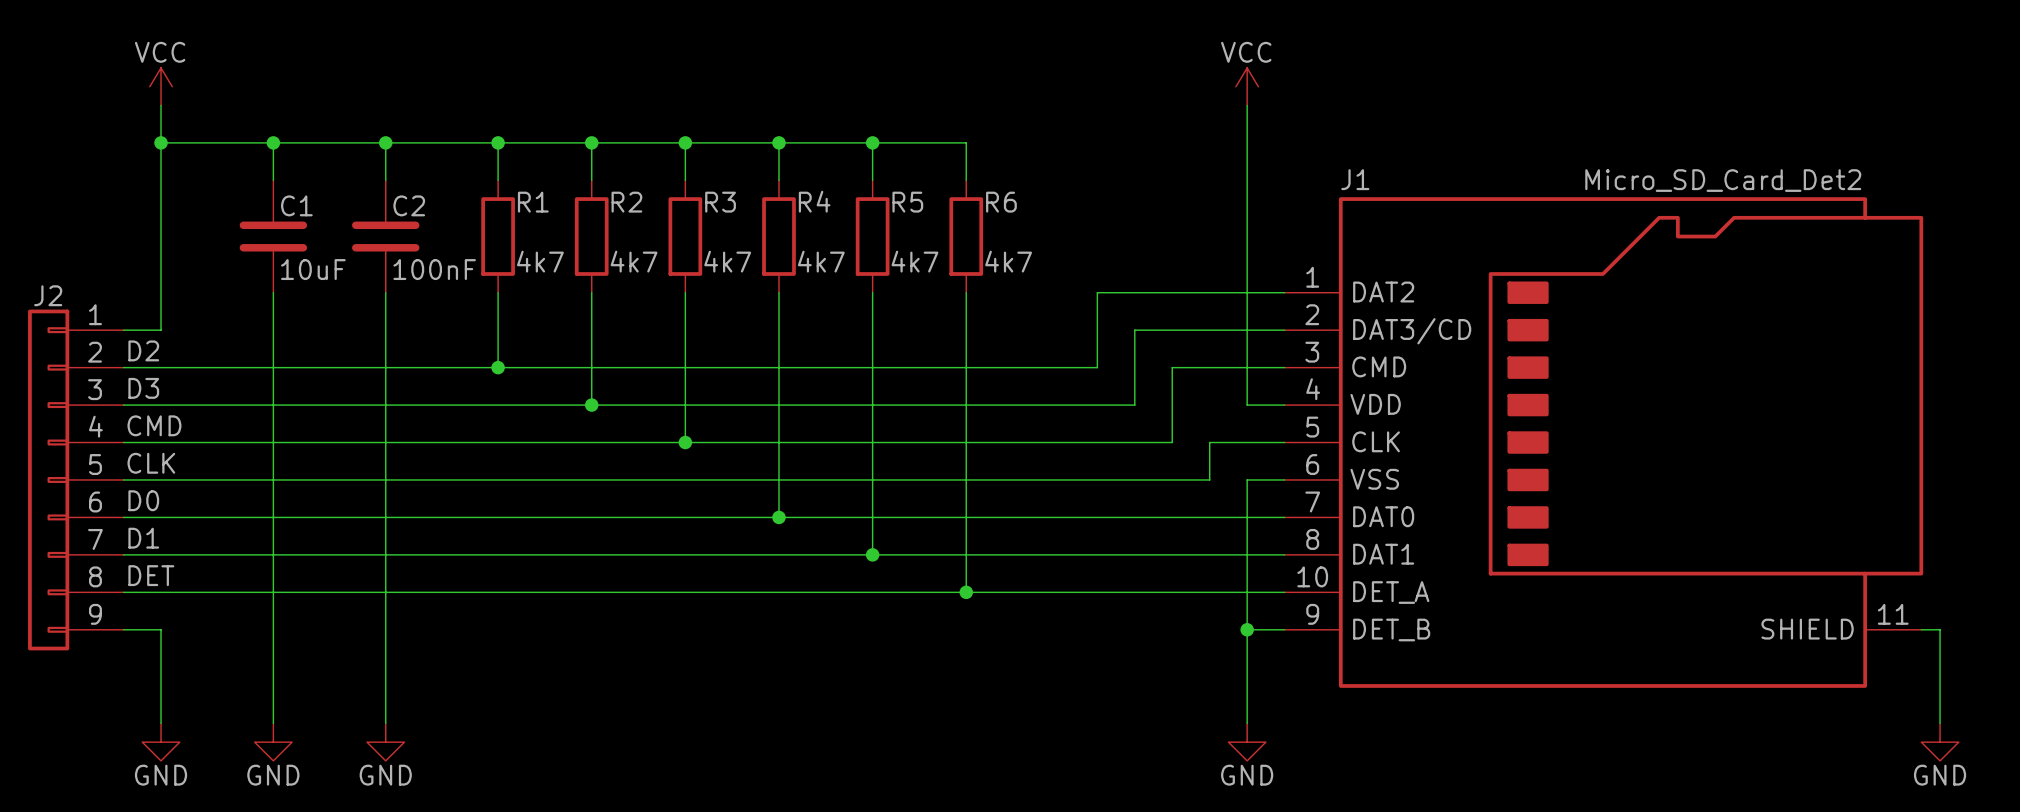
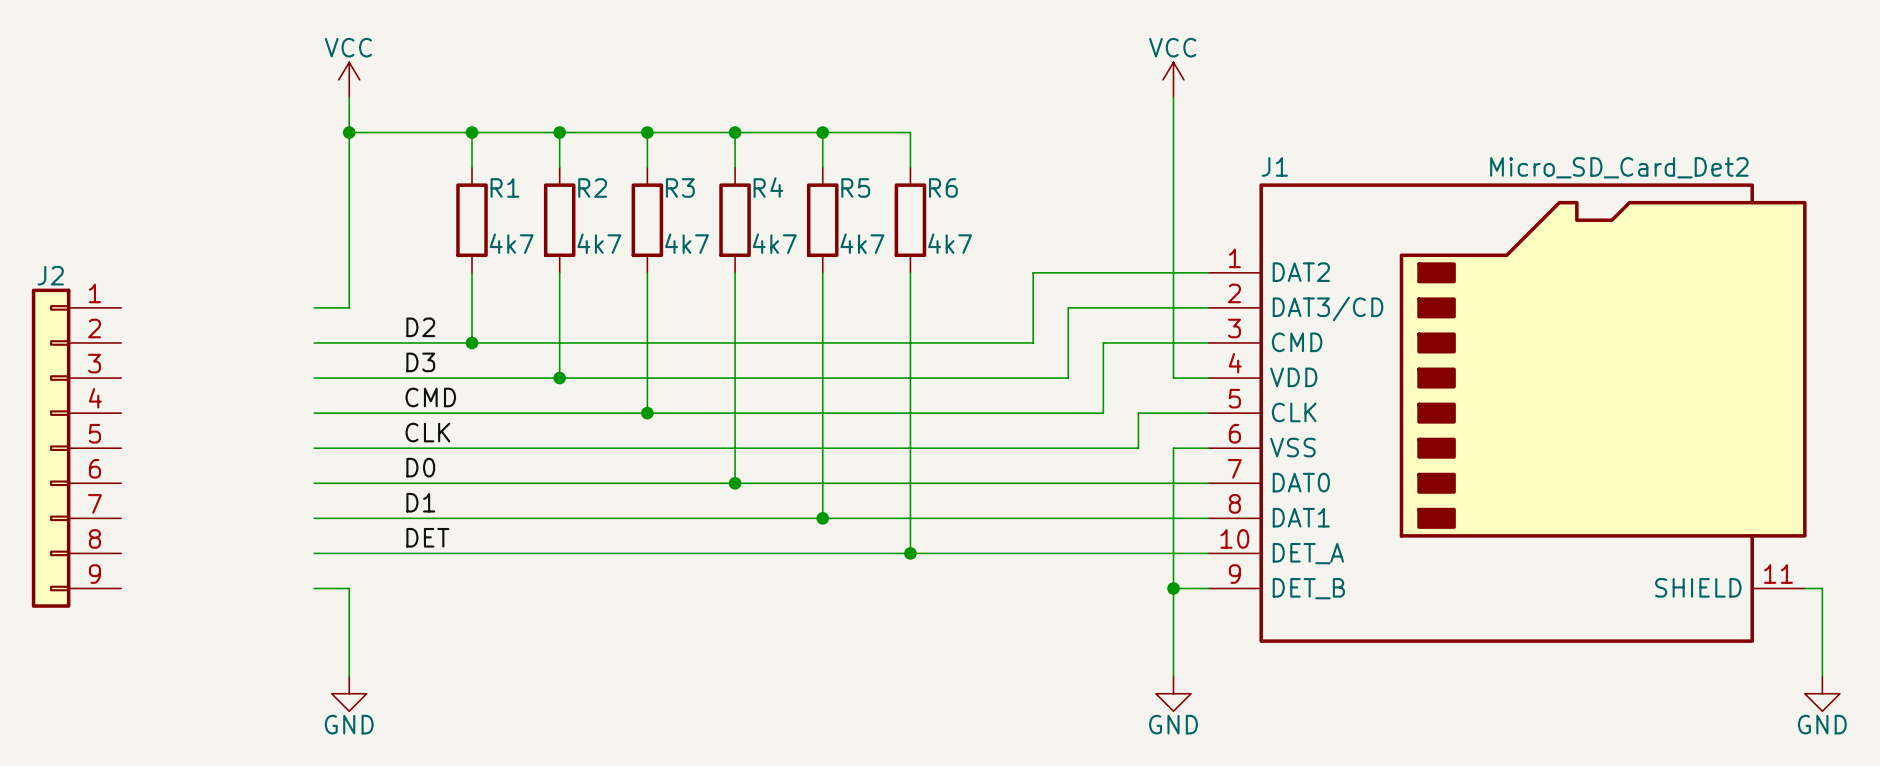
power symbol position: VCC (161, 86) -> VCC (349, 79)
wire: (161, 105) (161, 330) (123, 330) -> (349, 97) (349, 307) (314, 307)
wire: (161, 142) (367, 142) -> none
junction: (161, 142) -> none
wire: (273, 142) (273, 180) -> none
junction: (273, 142) -> none
wire: (385, 142) (385, 180) -> none
junction position: (385, 142) -> (349, 132)
C1: 10uF (273, 236) -> none
C2: 100nF (385, 236) -> none
wire: (273, 292) (273, 723) -> none
wire: (385, 292) (385, 723) -> none
label position: D2 (143, 350) -> D2 (420, 327)
wire: (123, 367) (329, 367) -> none
label position: D3 (143, 388) -> D3 (420, 362)
wire: (123, 405) (329, 405) -> none
label position: CMD (154, 425) -> CMD (430, 397)
wire: (123, 442) (329, 442) -> none
label position: CLK (151, 463) -> CLK (427, 432)
wire: (123, 479) (329, 479) -> none
label position: D0 (143, 500) -> D0 (420, 467)
wire: (123, 517) (329, 517) -> none
label position: D1 (143, 538) -> D1 (420, 502)
wire: (123, 554) (329, 554) -> none
label position: DET (151, 575) -> DET (427, 537)
wire: (123, 592) (329, 592) -> none
wire: (123, 629) (161, 629) (161, 723) -> (314, 588) (349, 588) (349, 676)
power symbol: GND (161, 742) -> none
power symbol: GND (273, 742) -> none
power symbol position: GND (385, 742) -> GND (349, 693)

